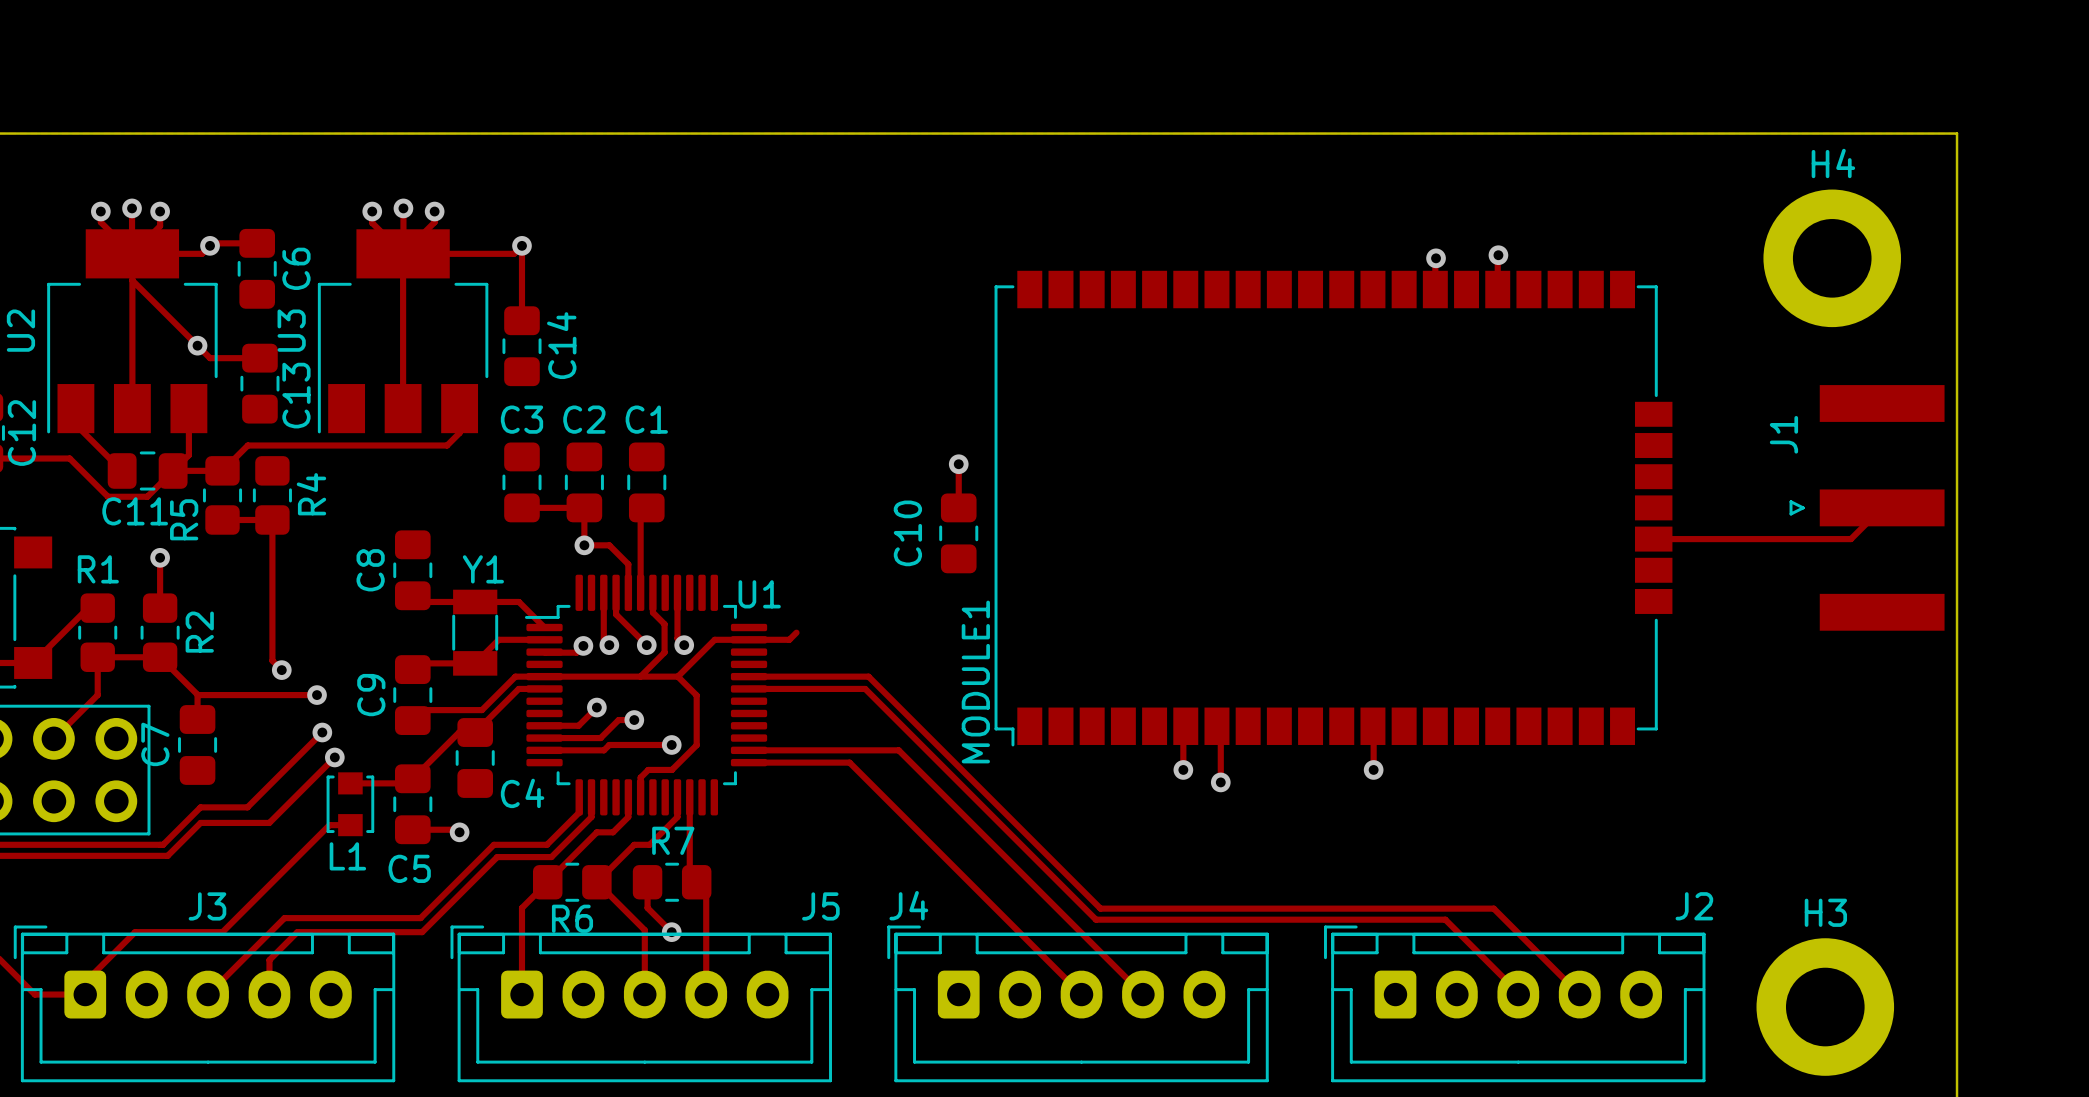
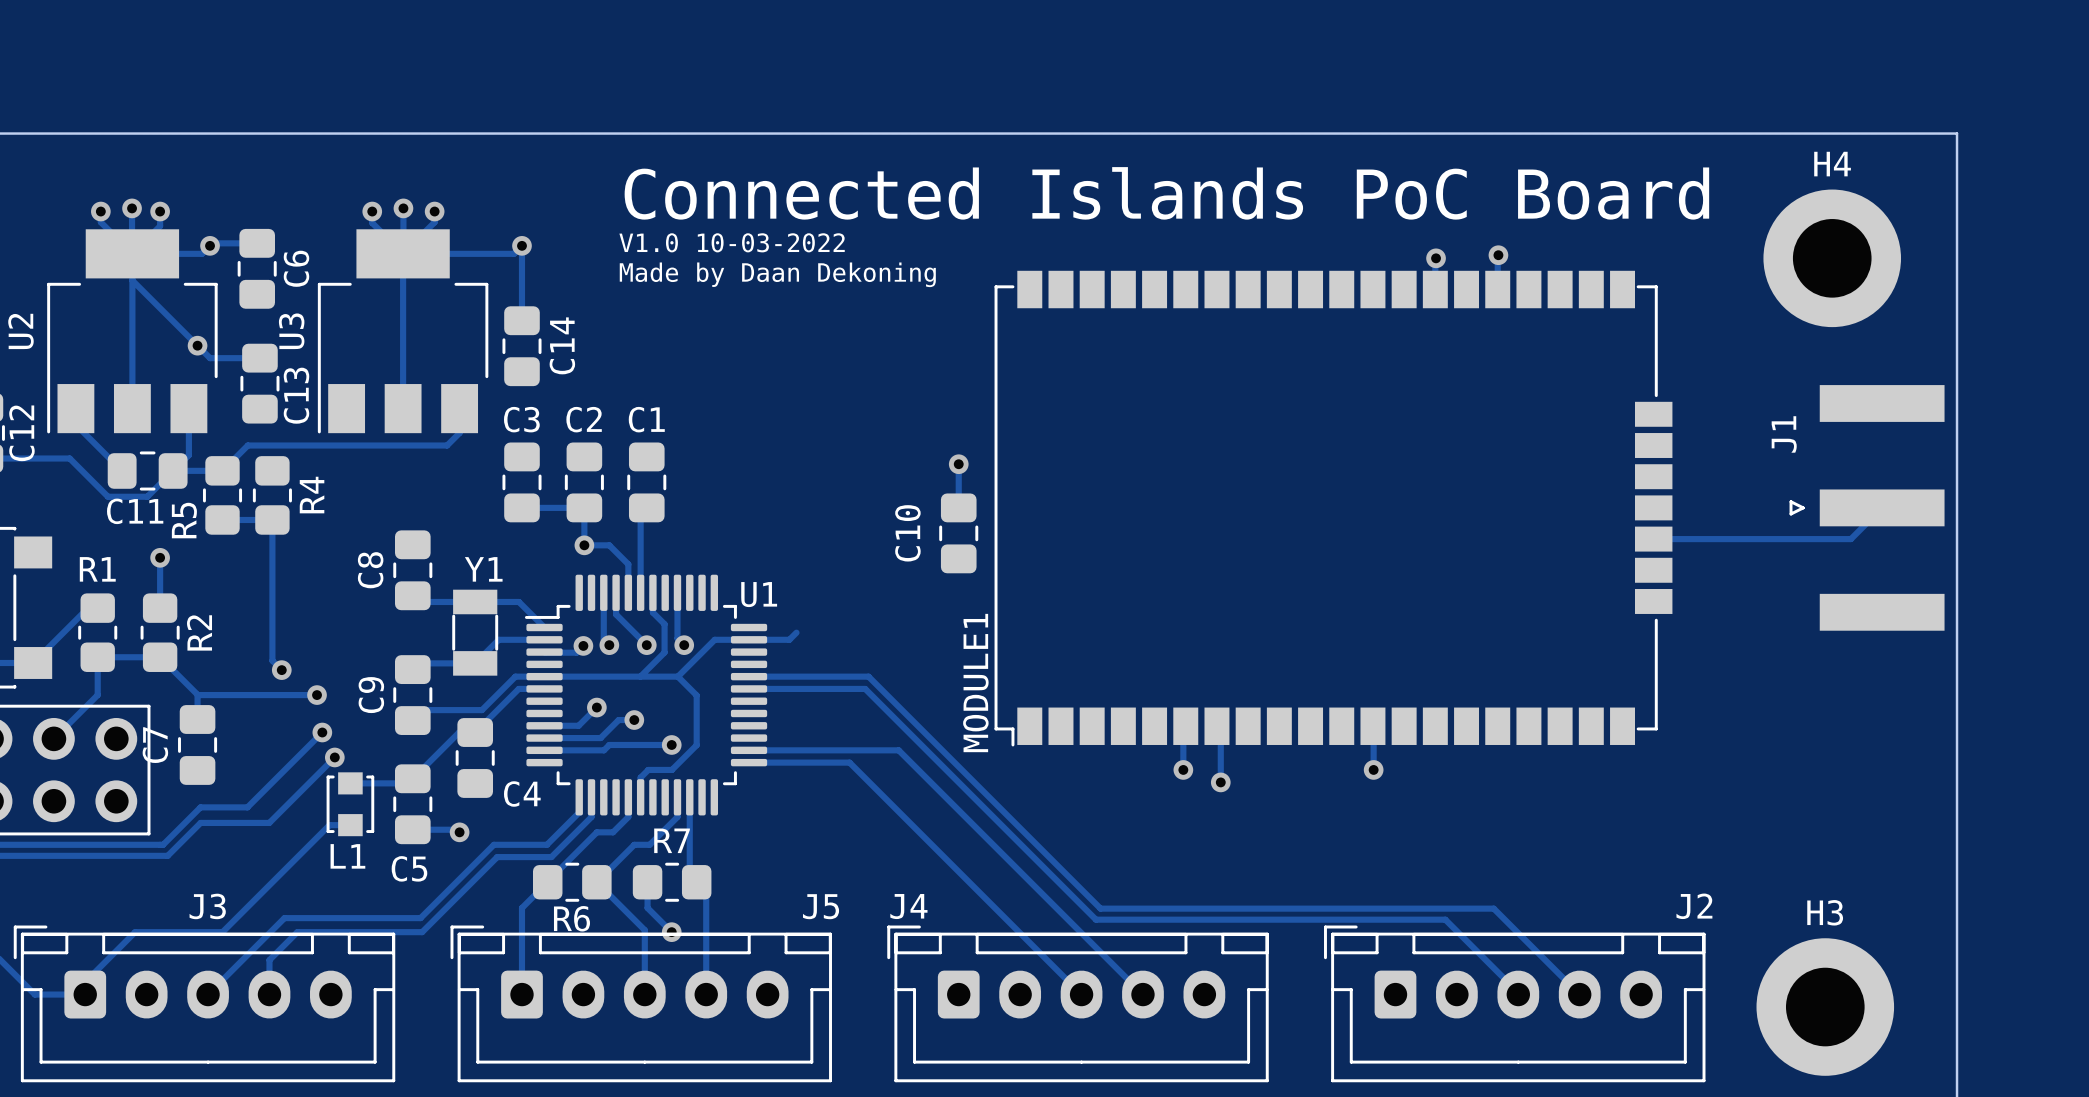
text: none -> Connected Islands PoC Board (1166, 193)
text: none -> V1.0 10-03-2022 (732, 242)
text: none -> Made by Daan Dekoning (777, 274)

